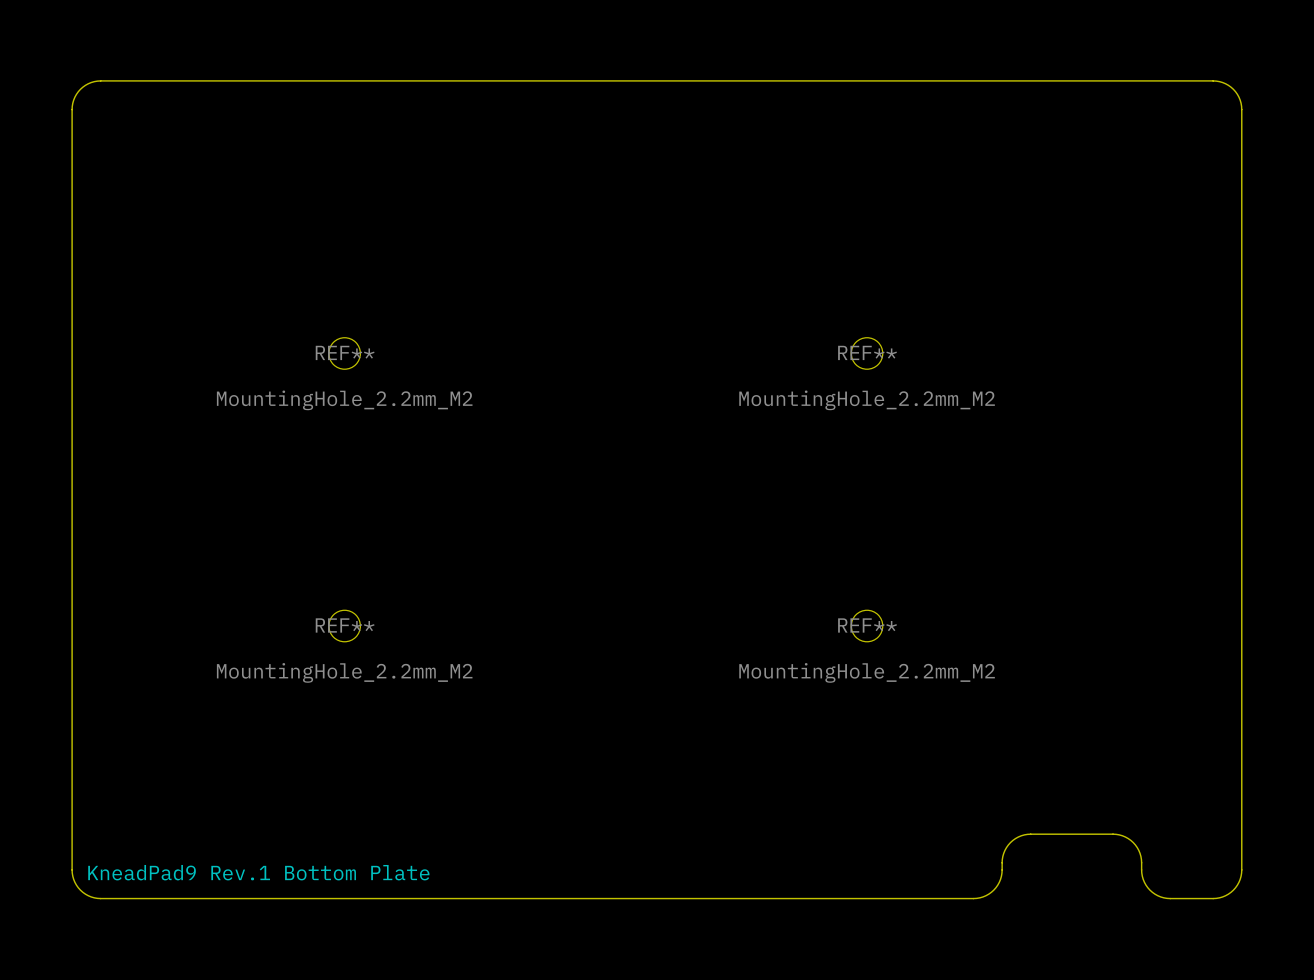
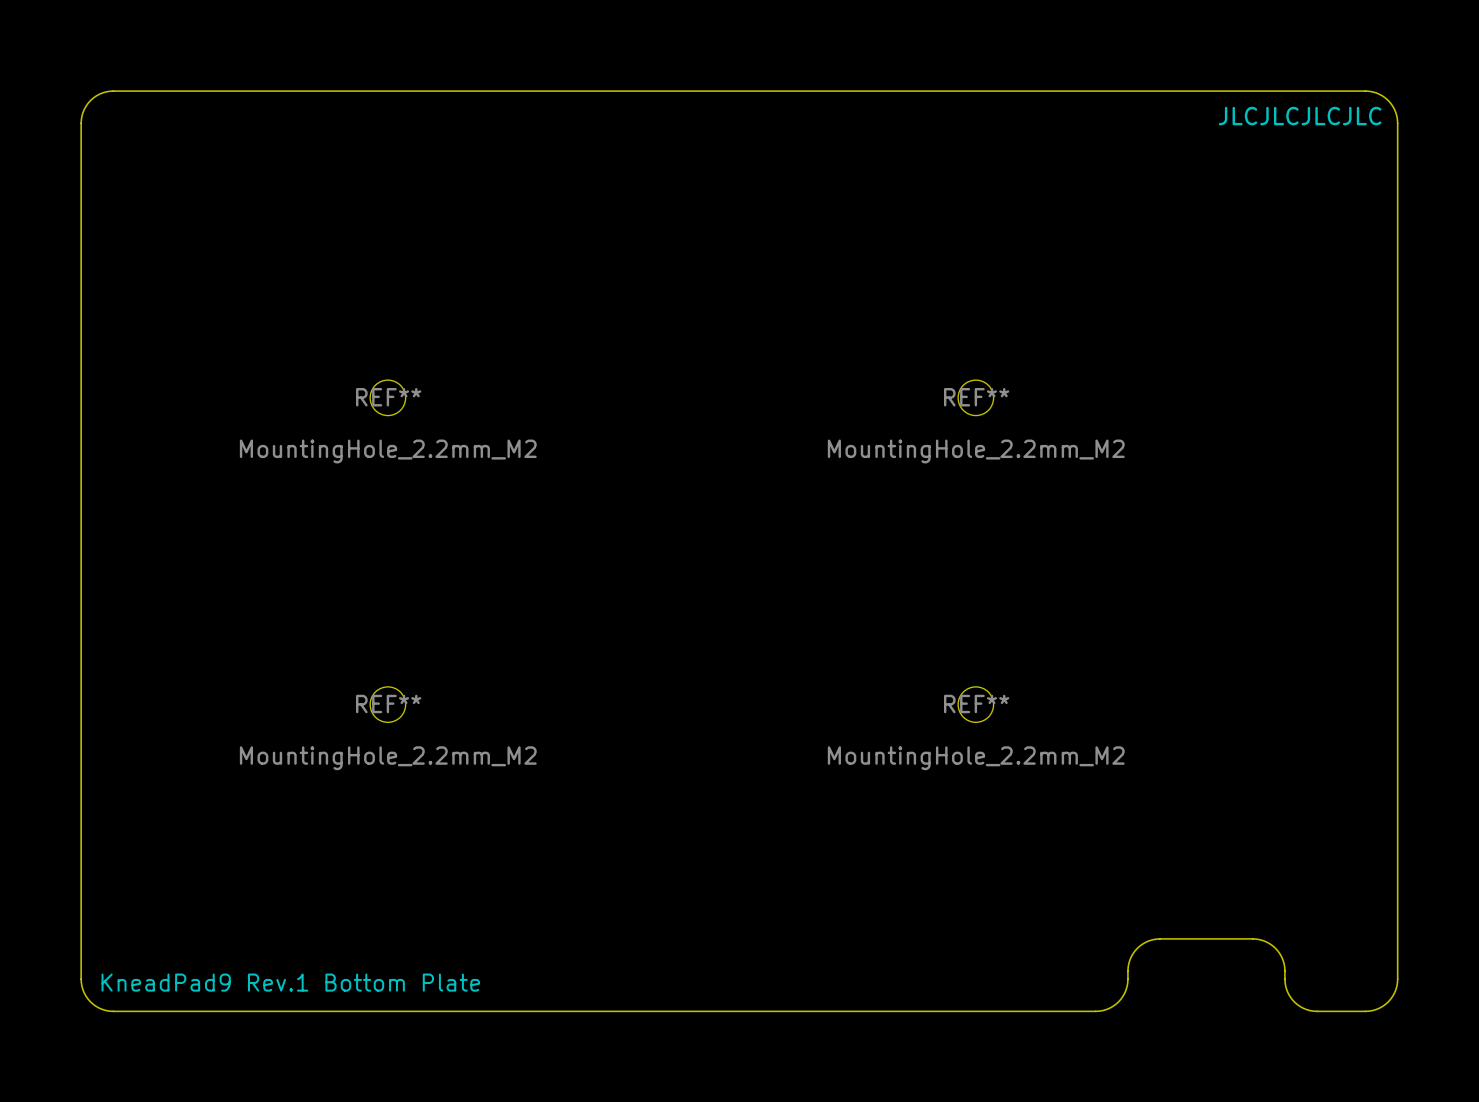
text: none -> JLCJLCJLCJLC (1300, 116)

